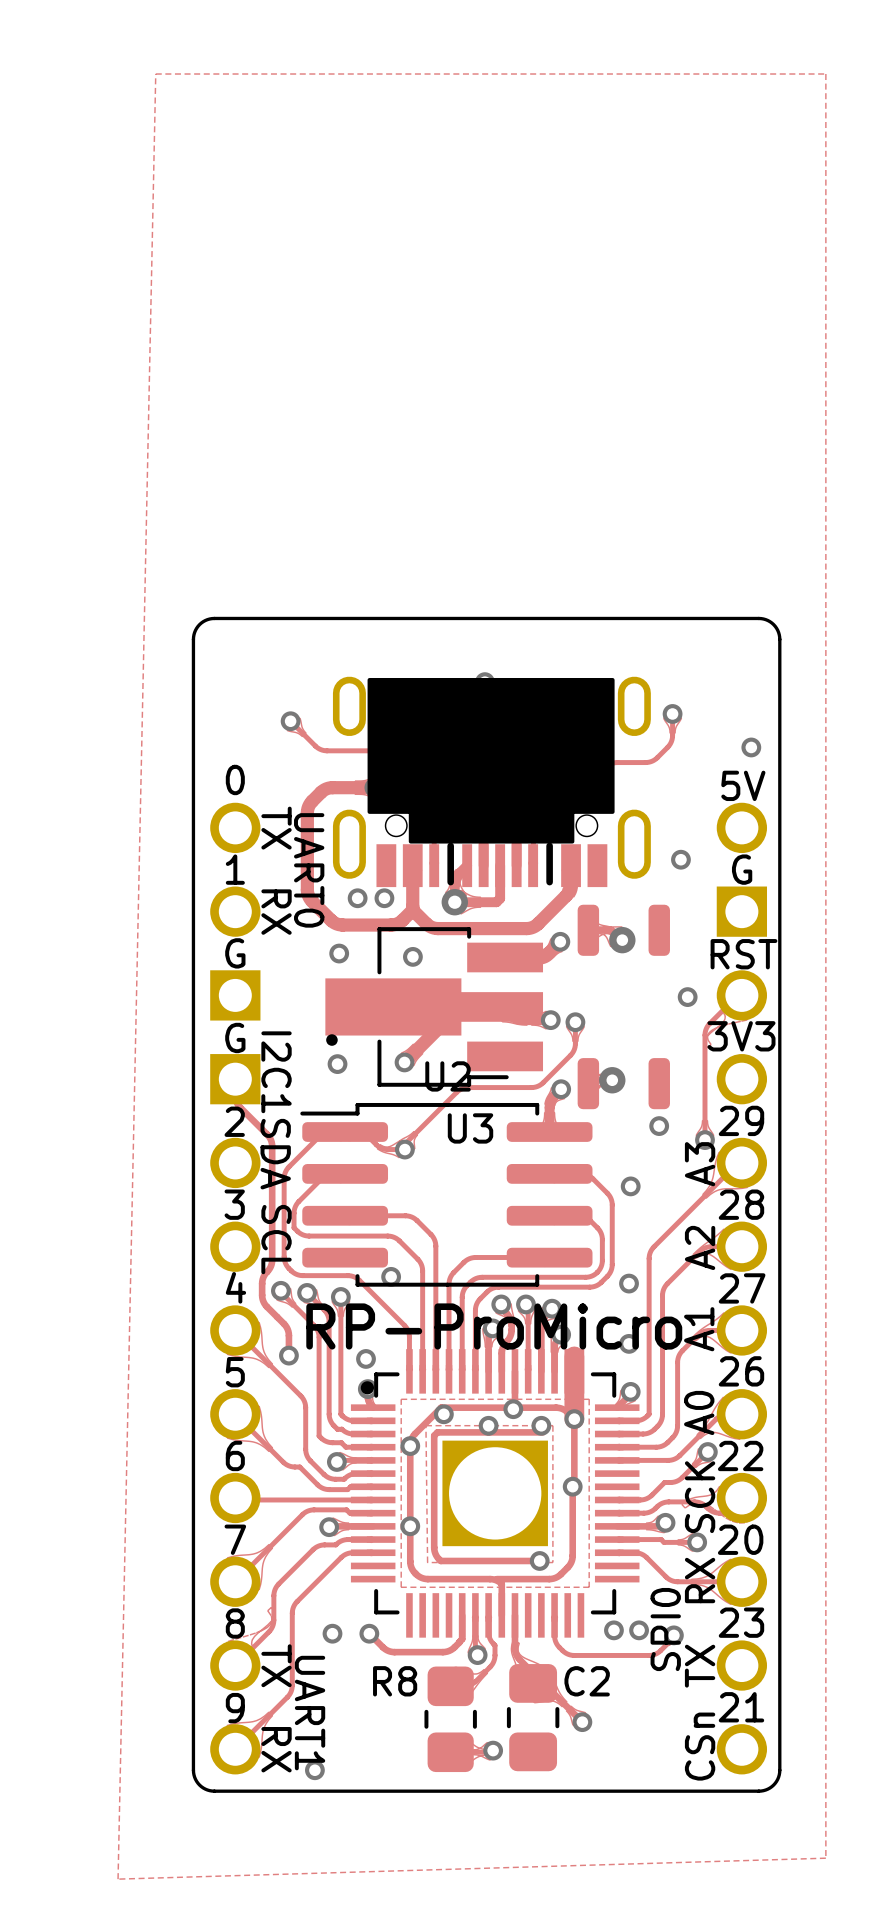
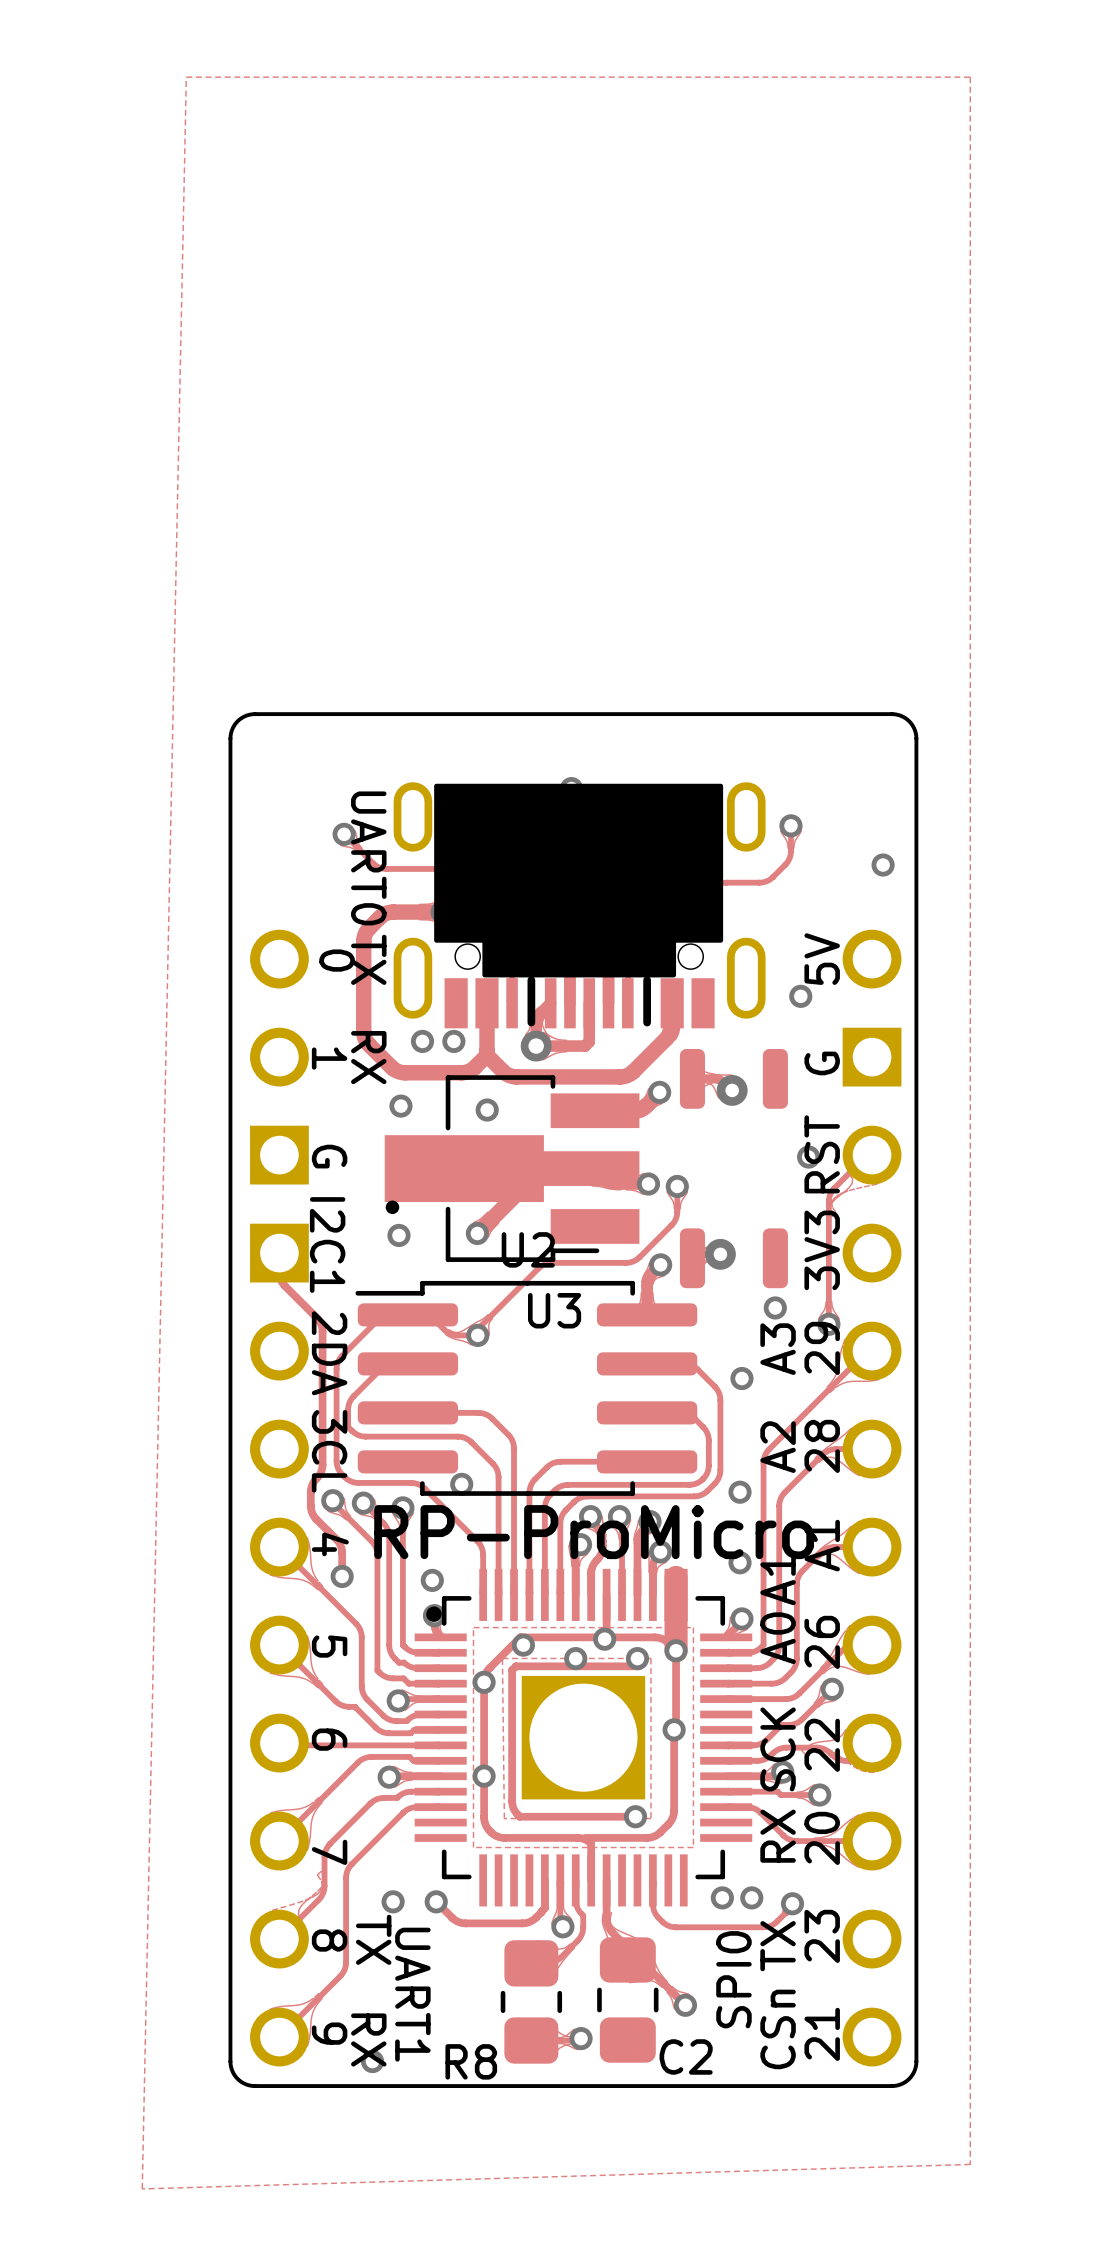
text rotation: 0° (235, 779) -> 90° counterclockwise (337, 960)
text position: 0 (235, 779) -> 0 (337, 960)
text rotation: 0° (743, 785) -> 90° counterclockwise (822, 959)
text position: TX (276, 828) -> TX (368, 959)
text: 1 (235, 869) -> none
text rotation: 0° (742, 869) -> 90° counterclockwise (822, 1063)
text position: G (742, 869) -> G (822, 1063)
text position: UART0 (309, 870) -> UART0 (368, 858)
text: RX (276, 912) -> 1 (329, 1058)
text: none -> RX (368, 1057)
text: G (235, 953) -> none
text rotation: 0° (743, 954) -> 90° counterclockwise (822, 1154)
text: none -> G (329, 1156)
text rotation: 0° (741, 1036) -> 90° counterclockwise (822, 1250)
text: G (235, 1037) -> none
text: 29 (741, 1120) -> none
text: 2 (234, 1121) -> none
text: SDA (275, 1154) -> 2DA (329, 1353)
text: none -> A3 (778, 1349)
text: A3 (700, 1164) -> 29 (822, 1348)
text: 3 (234, 1204) -> none
text: 28 (741, 1204) -> none
text: SCL (276, 1239) -> 3CL (329, 1451)
text: none -> A2 (778, 1447)
text: A2 (700, 1247) -> 28 (822, 1446)
text rotation: 0° (235, 1287) -> 90° clockwise (330, 1544)
text position: 4 (235, 1287) -> 4 (330, 1544)
text: 27 (742, 1288) -> none
text position: RP-ProMicro (494, 1326) -> RP-ProMicro (594, 1532)
text: none -> A1 (778, 1579)
text: 26 (741, 1371) -> none
text rotation: 0° (235, 1372) -> 90° clockwise (329, 1646)
text position: 5 (235, 1372) -> 5 (329, 1646)
text: none -> A0 (778, 1638)
text: A0 (699, 1412) -> 26 (822, 1642)
text rotation: 0° (235, 1455) -> 90° clockwise (329, 1739)
text position: 6 (235, 1455) -> 6 (329, 1739)
text: 22 (740, 1455) -> none
text: SCK (700, 1497) -> 22 (822, 1745)
text: none -> SCK (778, 1749)
text rotation: 0° (235, 1539) -> 90° clockwise (329, 1852)
text position: 7 (235, 1539) -> 7 (329, 1852)
text: 20 (740, 1539) -> none
text: none -> RX (778, 1836)
text: RX (700, 1580) -> 20 (822, 1838)
text: 23 (741, 1622) -> none
text: 8 (235, 1623) -> none
text position: SPI0 (665, 1629) -> SPI0 (733, 1979)
text: TX (276, 1665) -> 8 (329, 1940)
text: none -> TX (373, 1939)
text: TX (700, 1666) -> 23 (822, 1936)
text: none -> TX (778, 1946)
R8 name position: R8 (395, 1681) -> R8 (471, 2061)
C2 name position: C2 (587, 1681) -> C2 (686, 2056)
text: 21 (741, 1707) -> none
text: 9 (235, 1708) -> none
text position: UART1 (310, 1713) -> UART1 (412, 1994)
text: none -> CSn (778, 2029)
text: CSn (700, 1746) -> 21 (822, 2034)
text: RX (276, 1749) -> 9 (329, 2033)
text: none -> RX (368, 2039)

